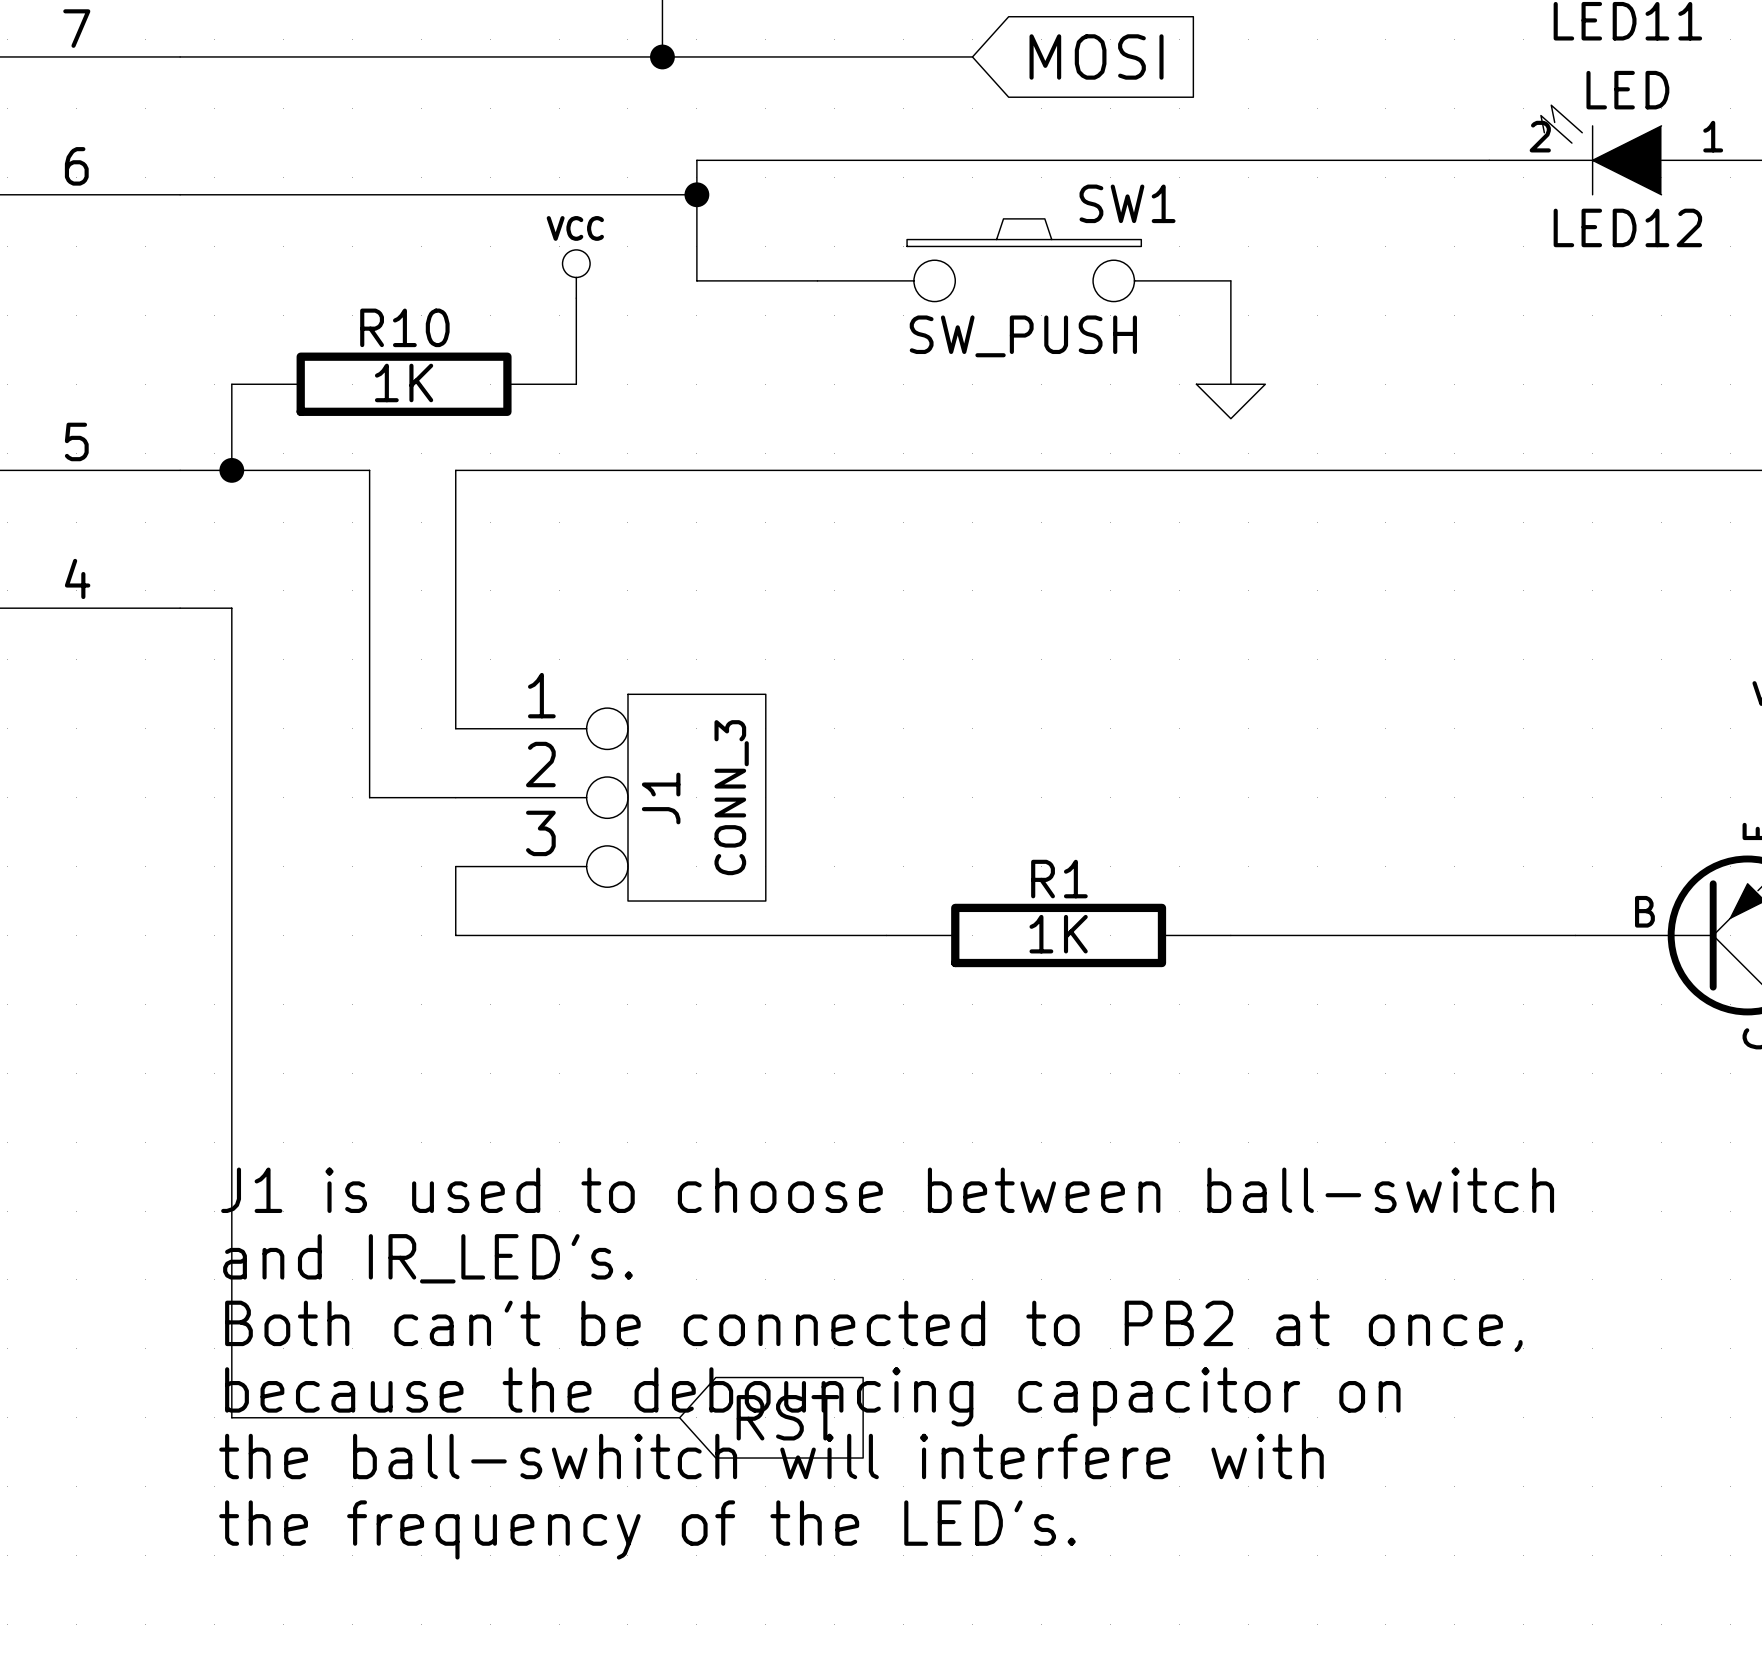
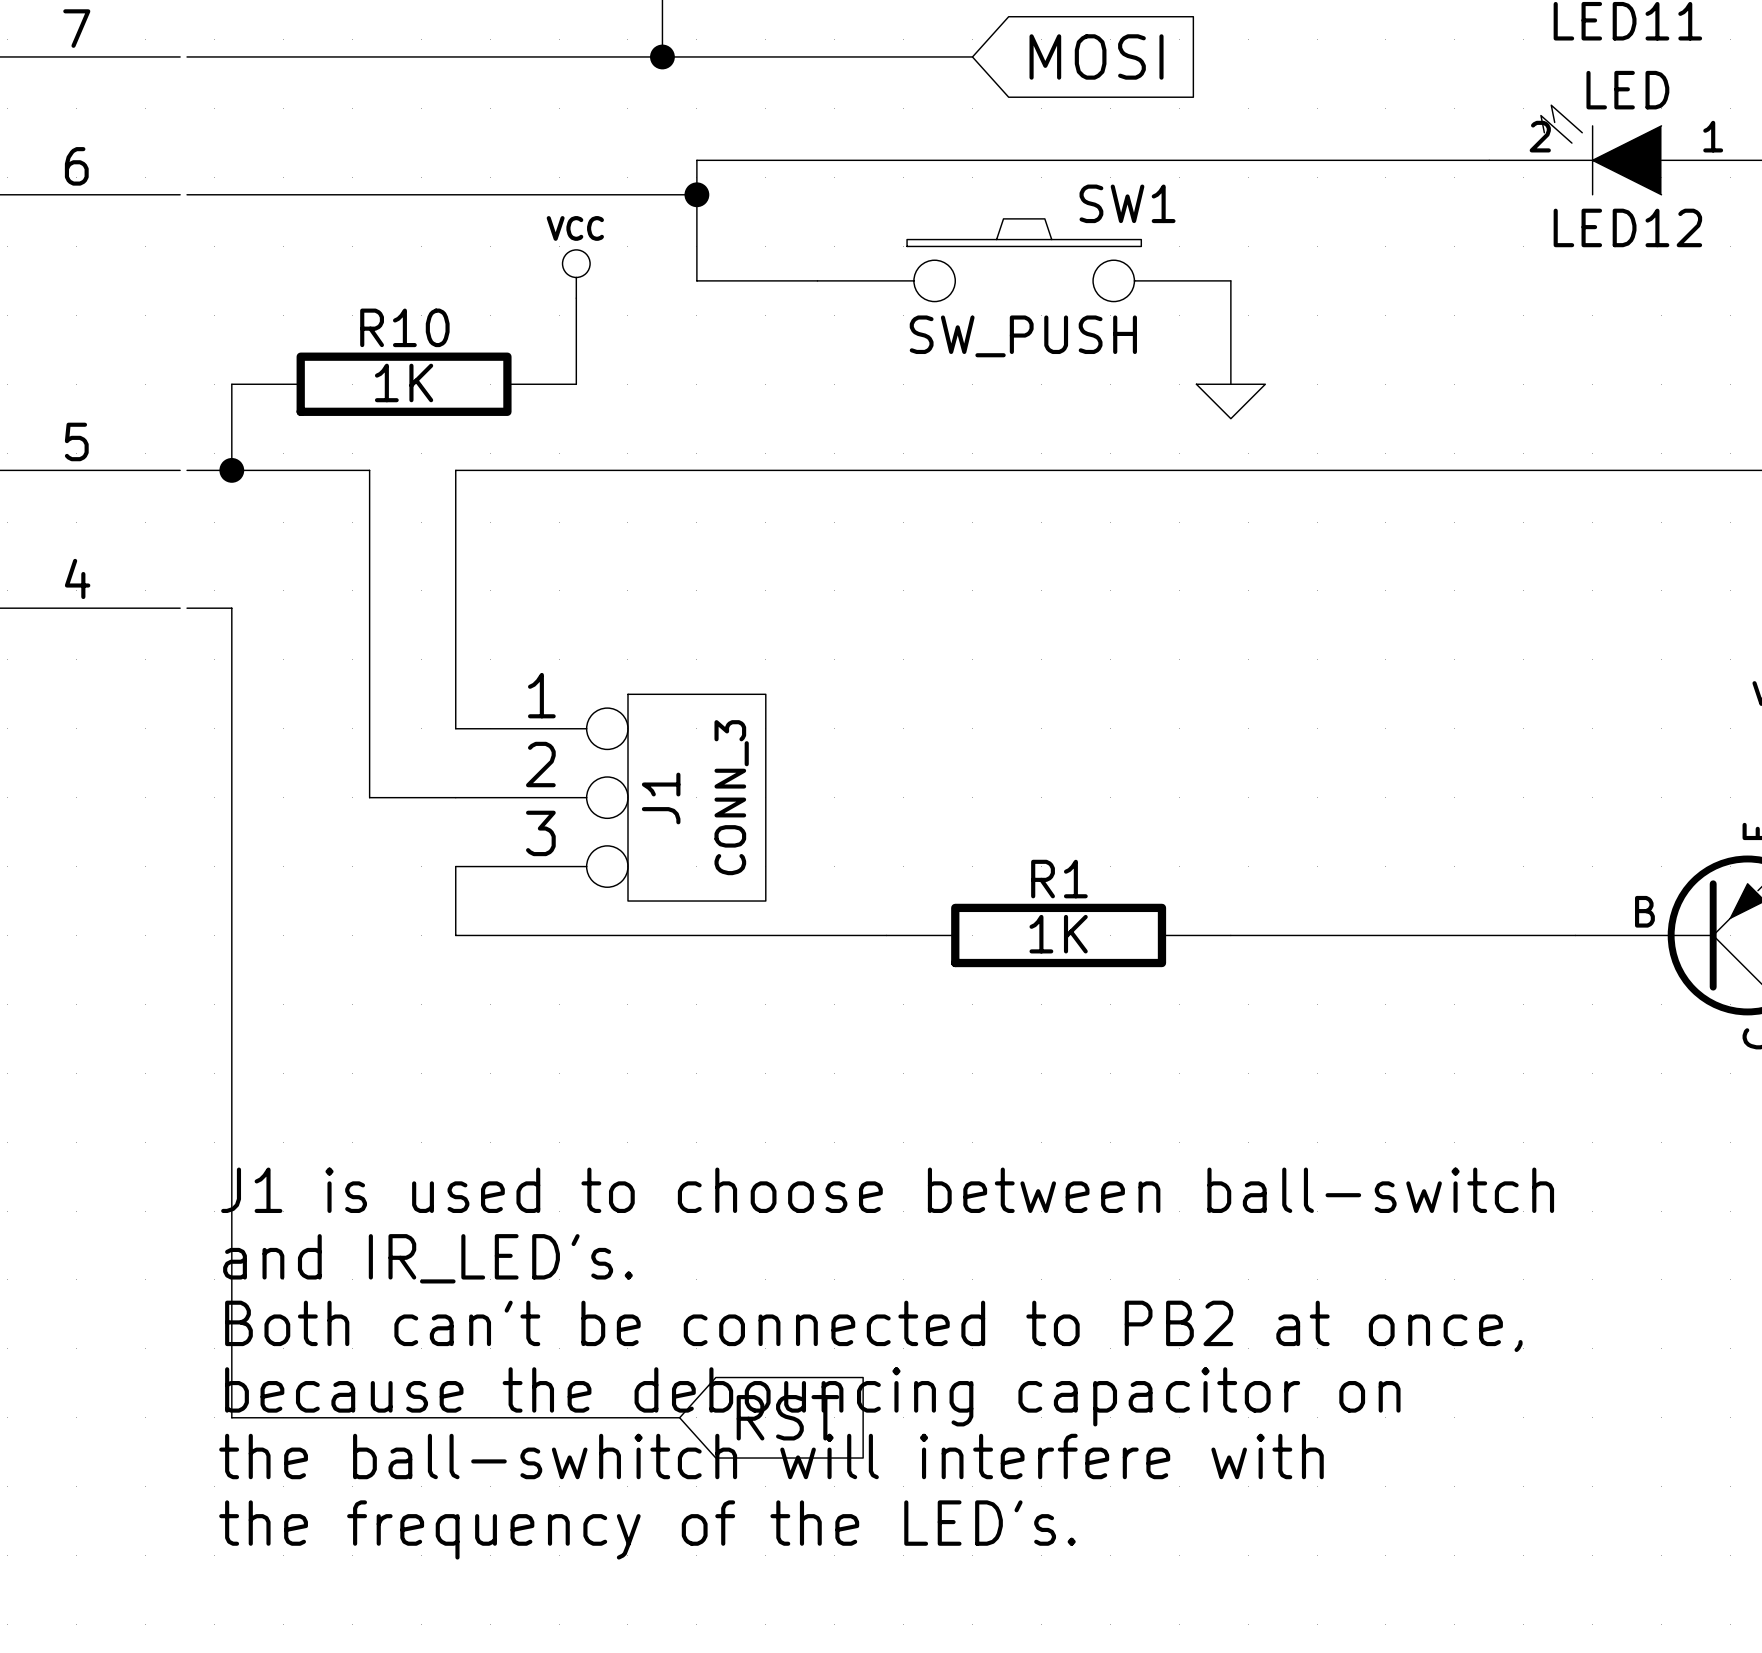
wire: (180, 56) (187, 56) -> none
wire: (180, 194) (187, 194) -> none
wire: (180, 470) (187, 470) -> none
wire: (180, 608) (187, 608) -> none

